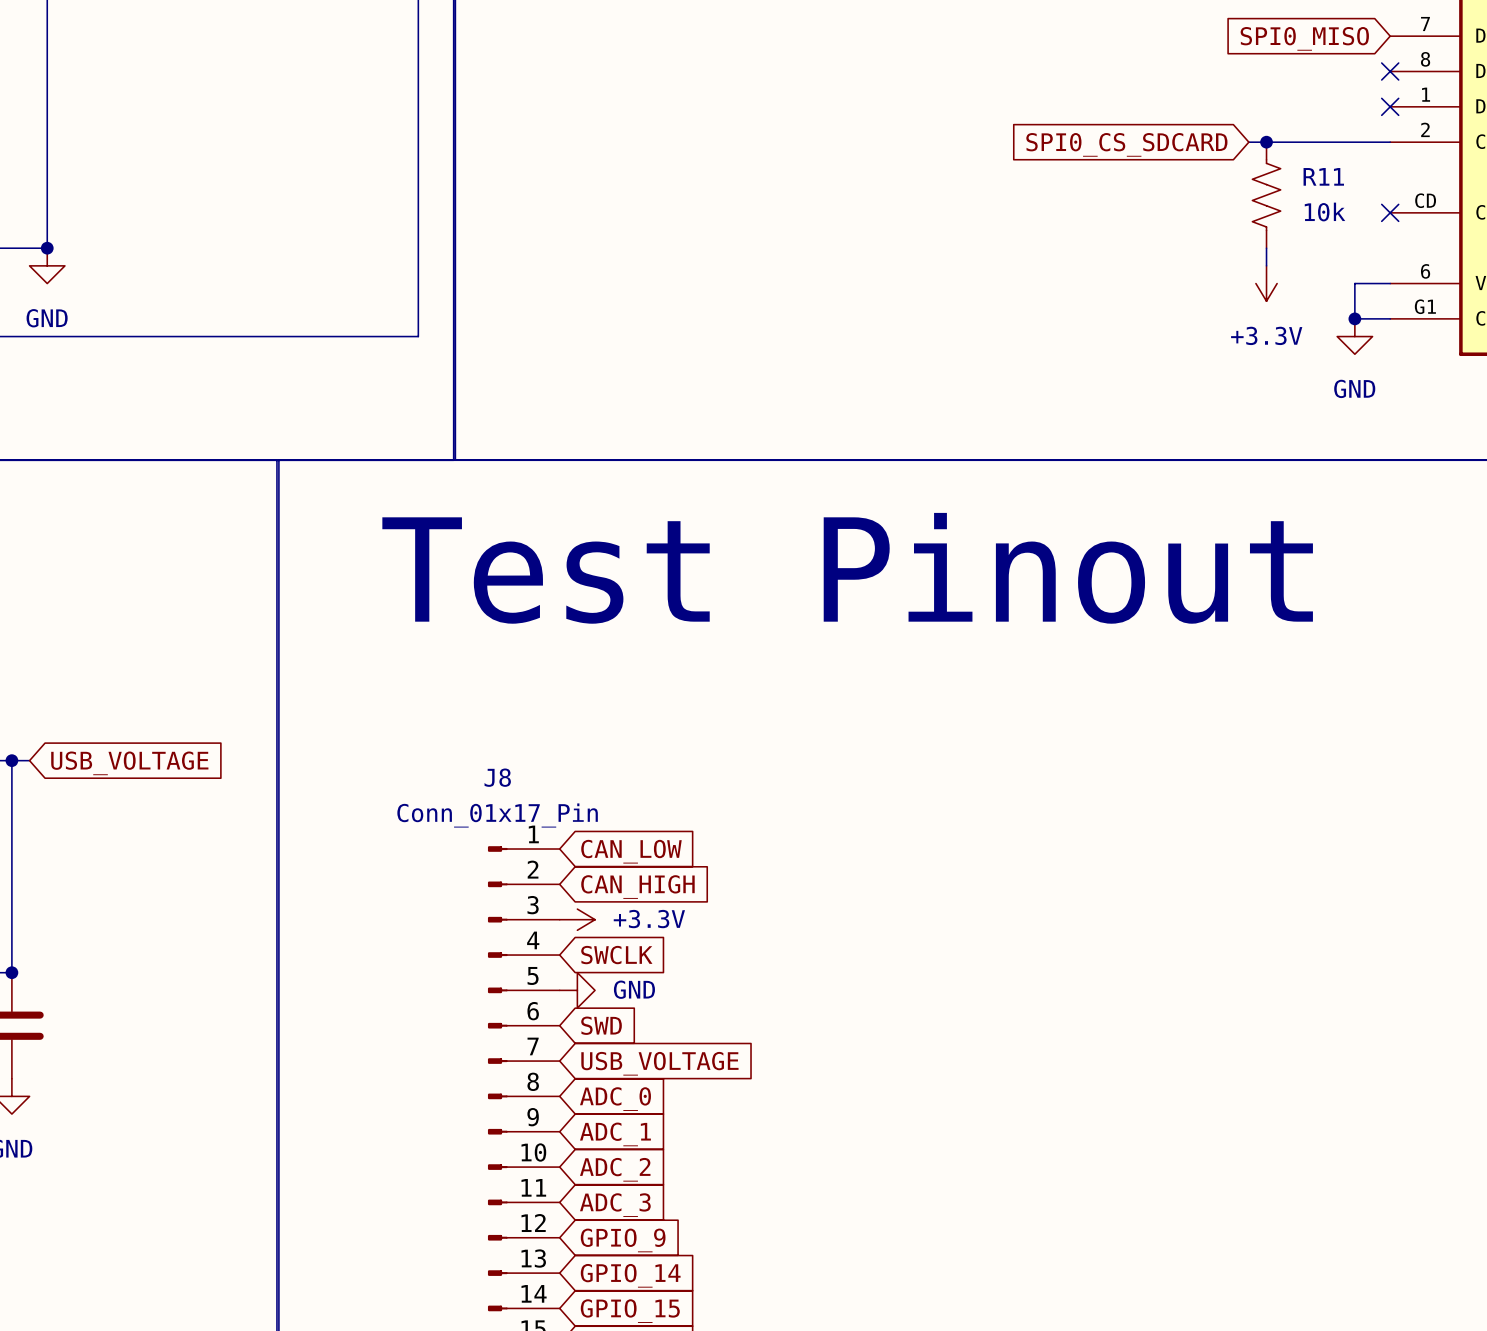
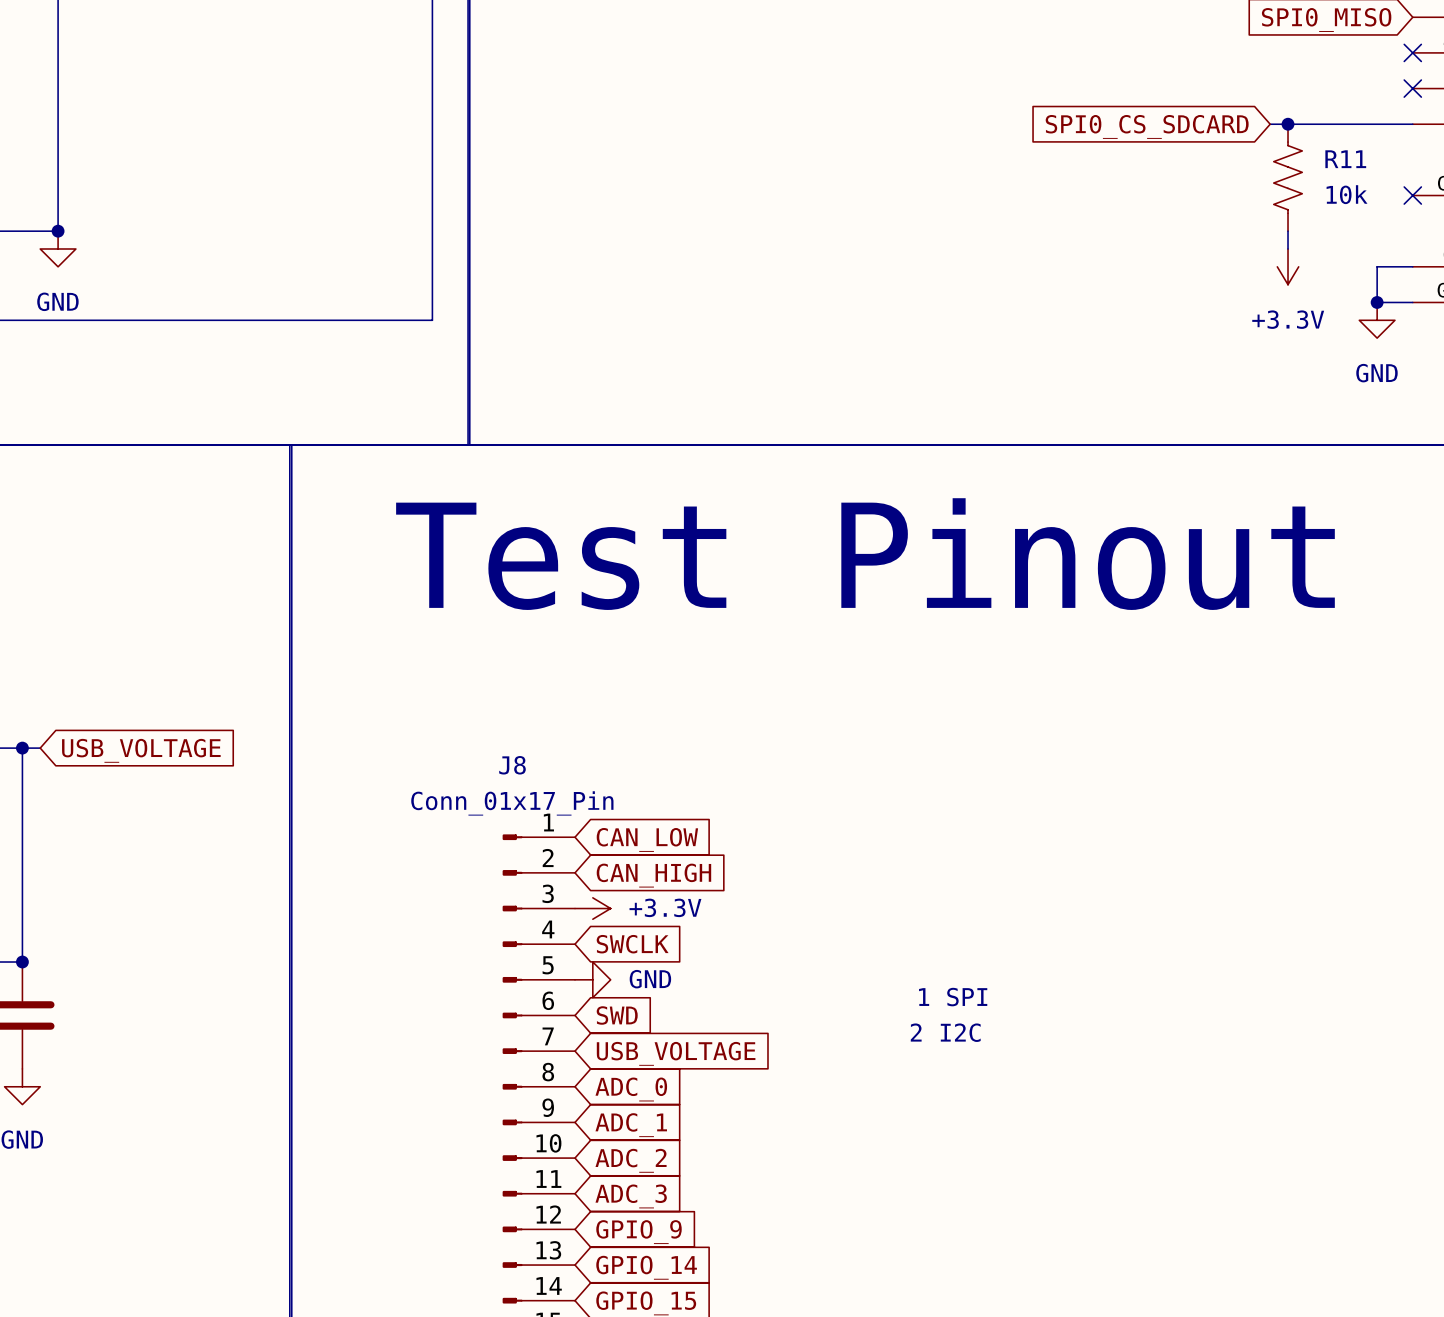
text: none -> 1 SPI (953, 997)
text: none -> 2 I2C (945, 1032)

